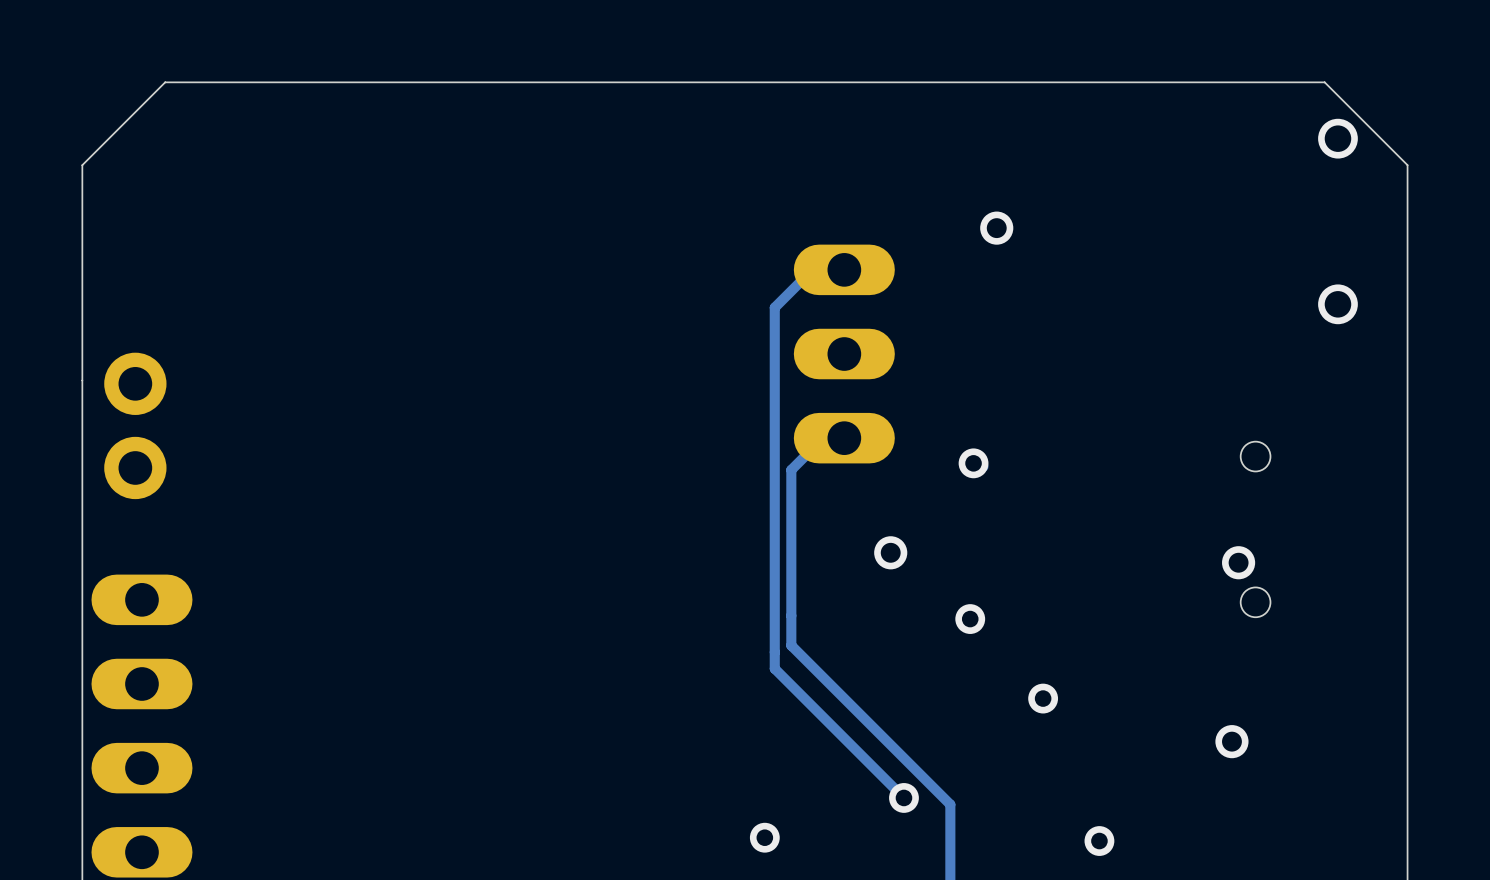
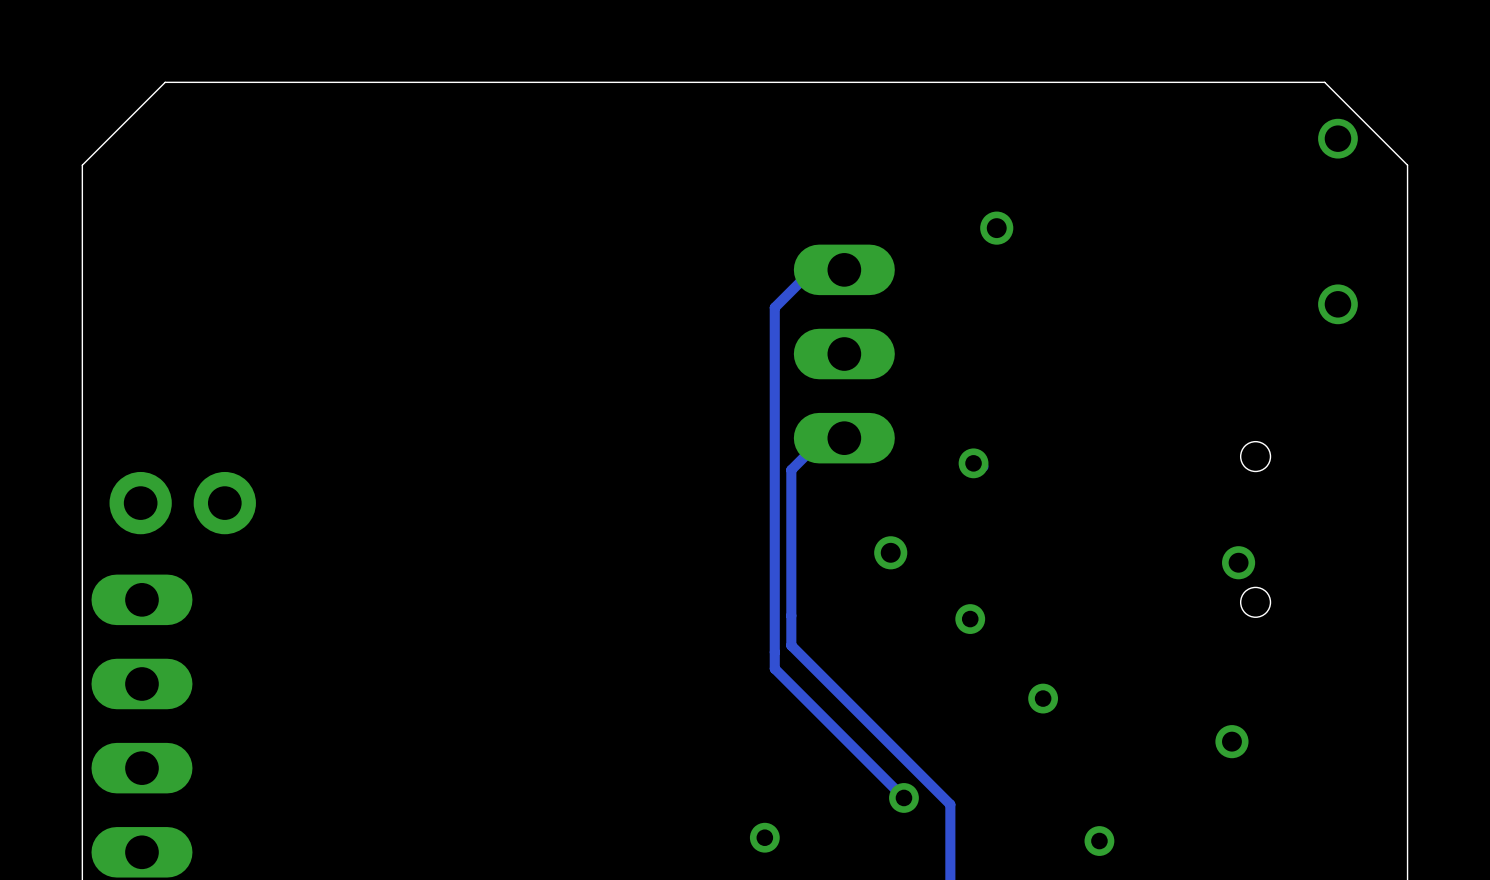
part rotation: 0° (135, 425) -> 90° clockwise (182, 503)
part position: (135, 425) -> (182, 503)

